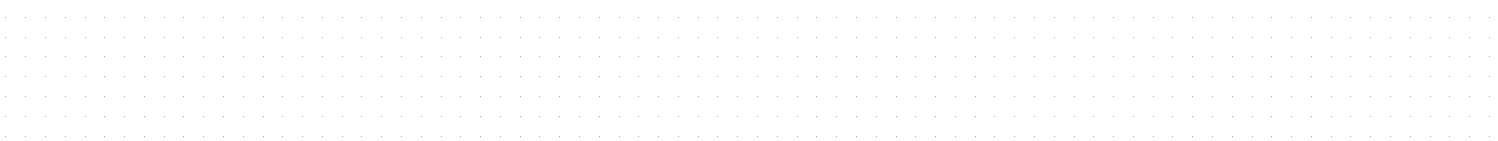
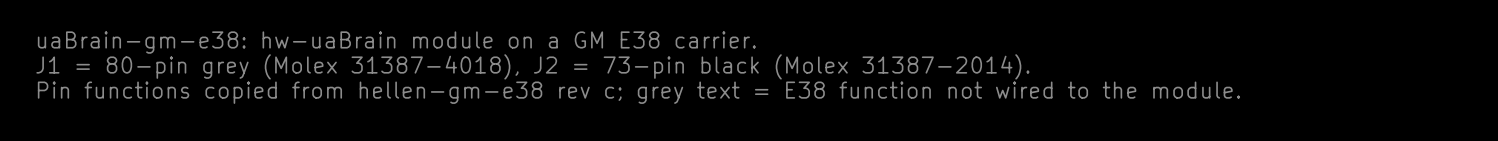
text: none -> uaBrain-gm-e38: hw-uaBrain module on a GM E38 carrier. (396, 42)
text: none -> J1 = 80-pin grey (Molex 31387-4018), J2 = 73-pin black (Molex 31387-2014). (532, 66)
text: none -> Pin functions copied from hellen-gm-e38 rev c; grey text = E38 function not wired to the module. (638, 92)

